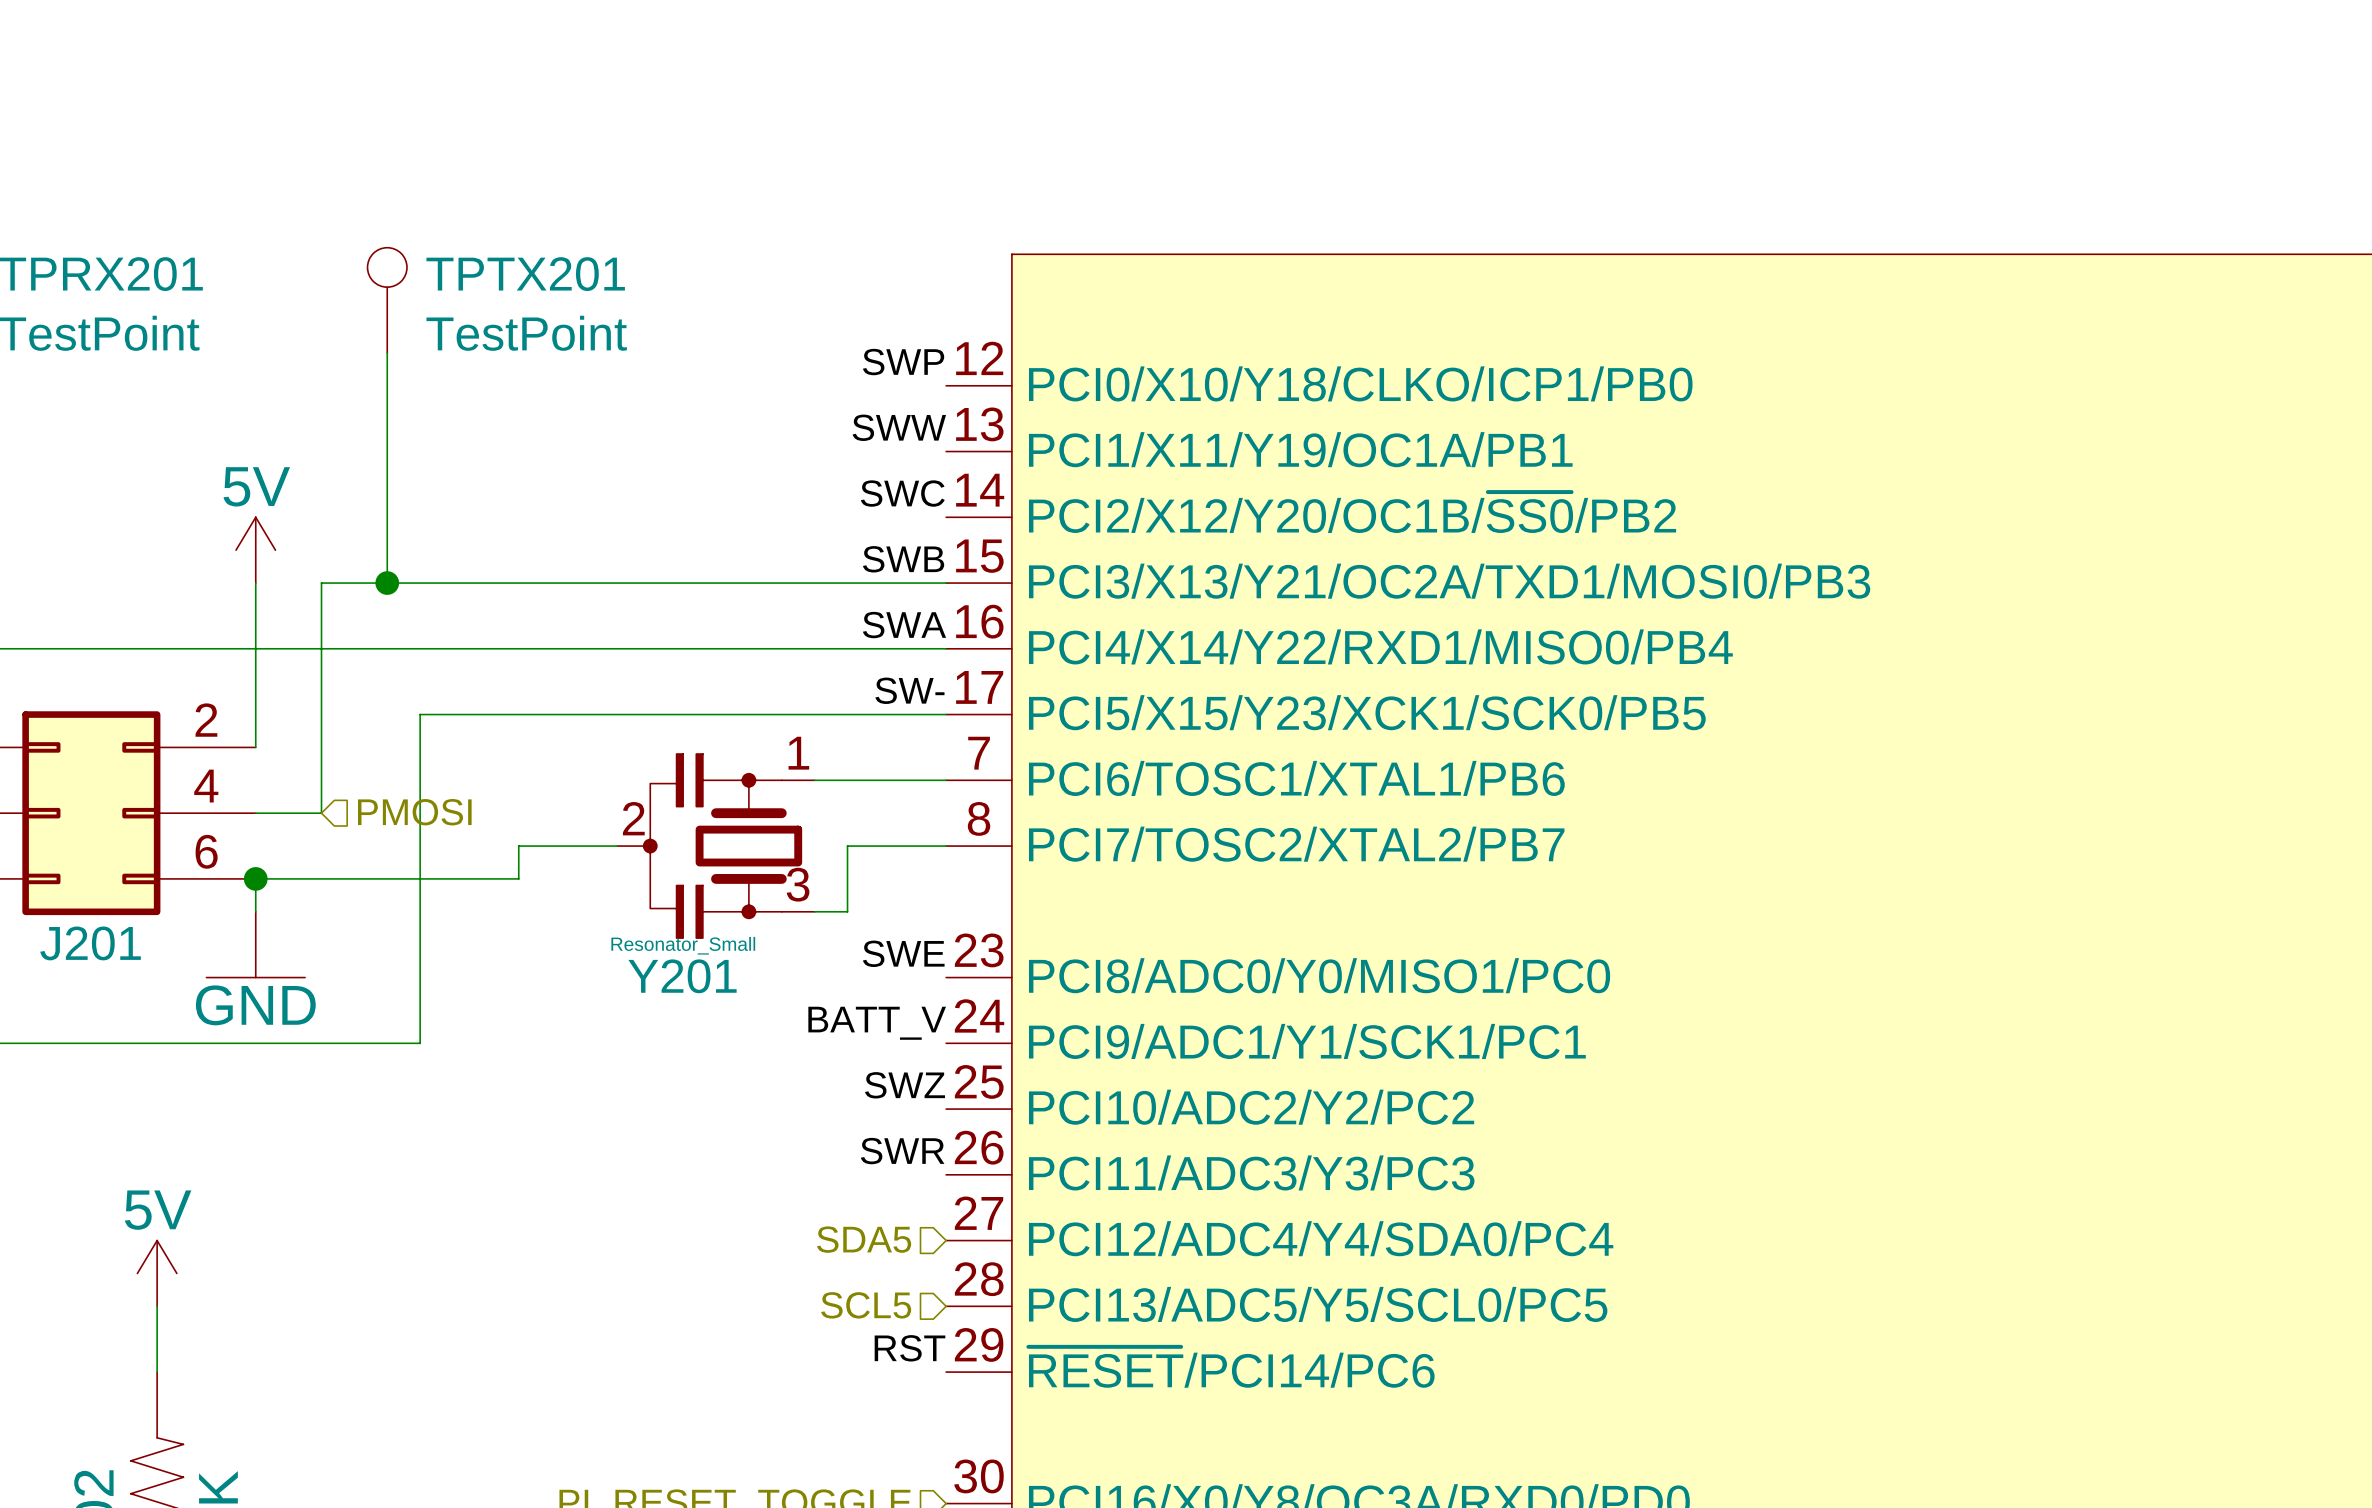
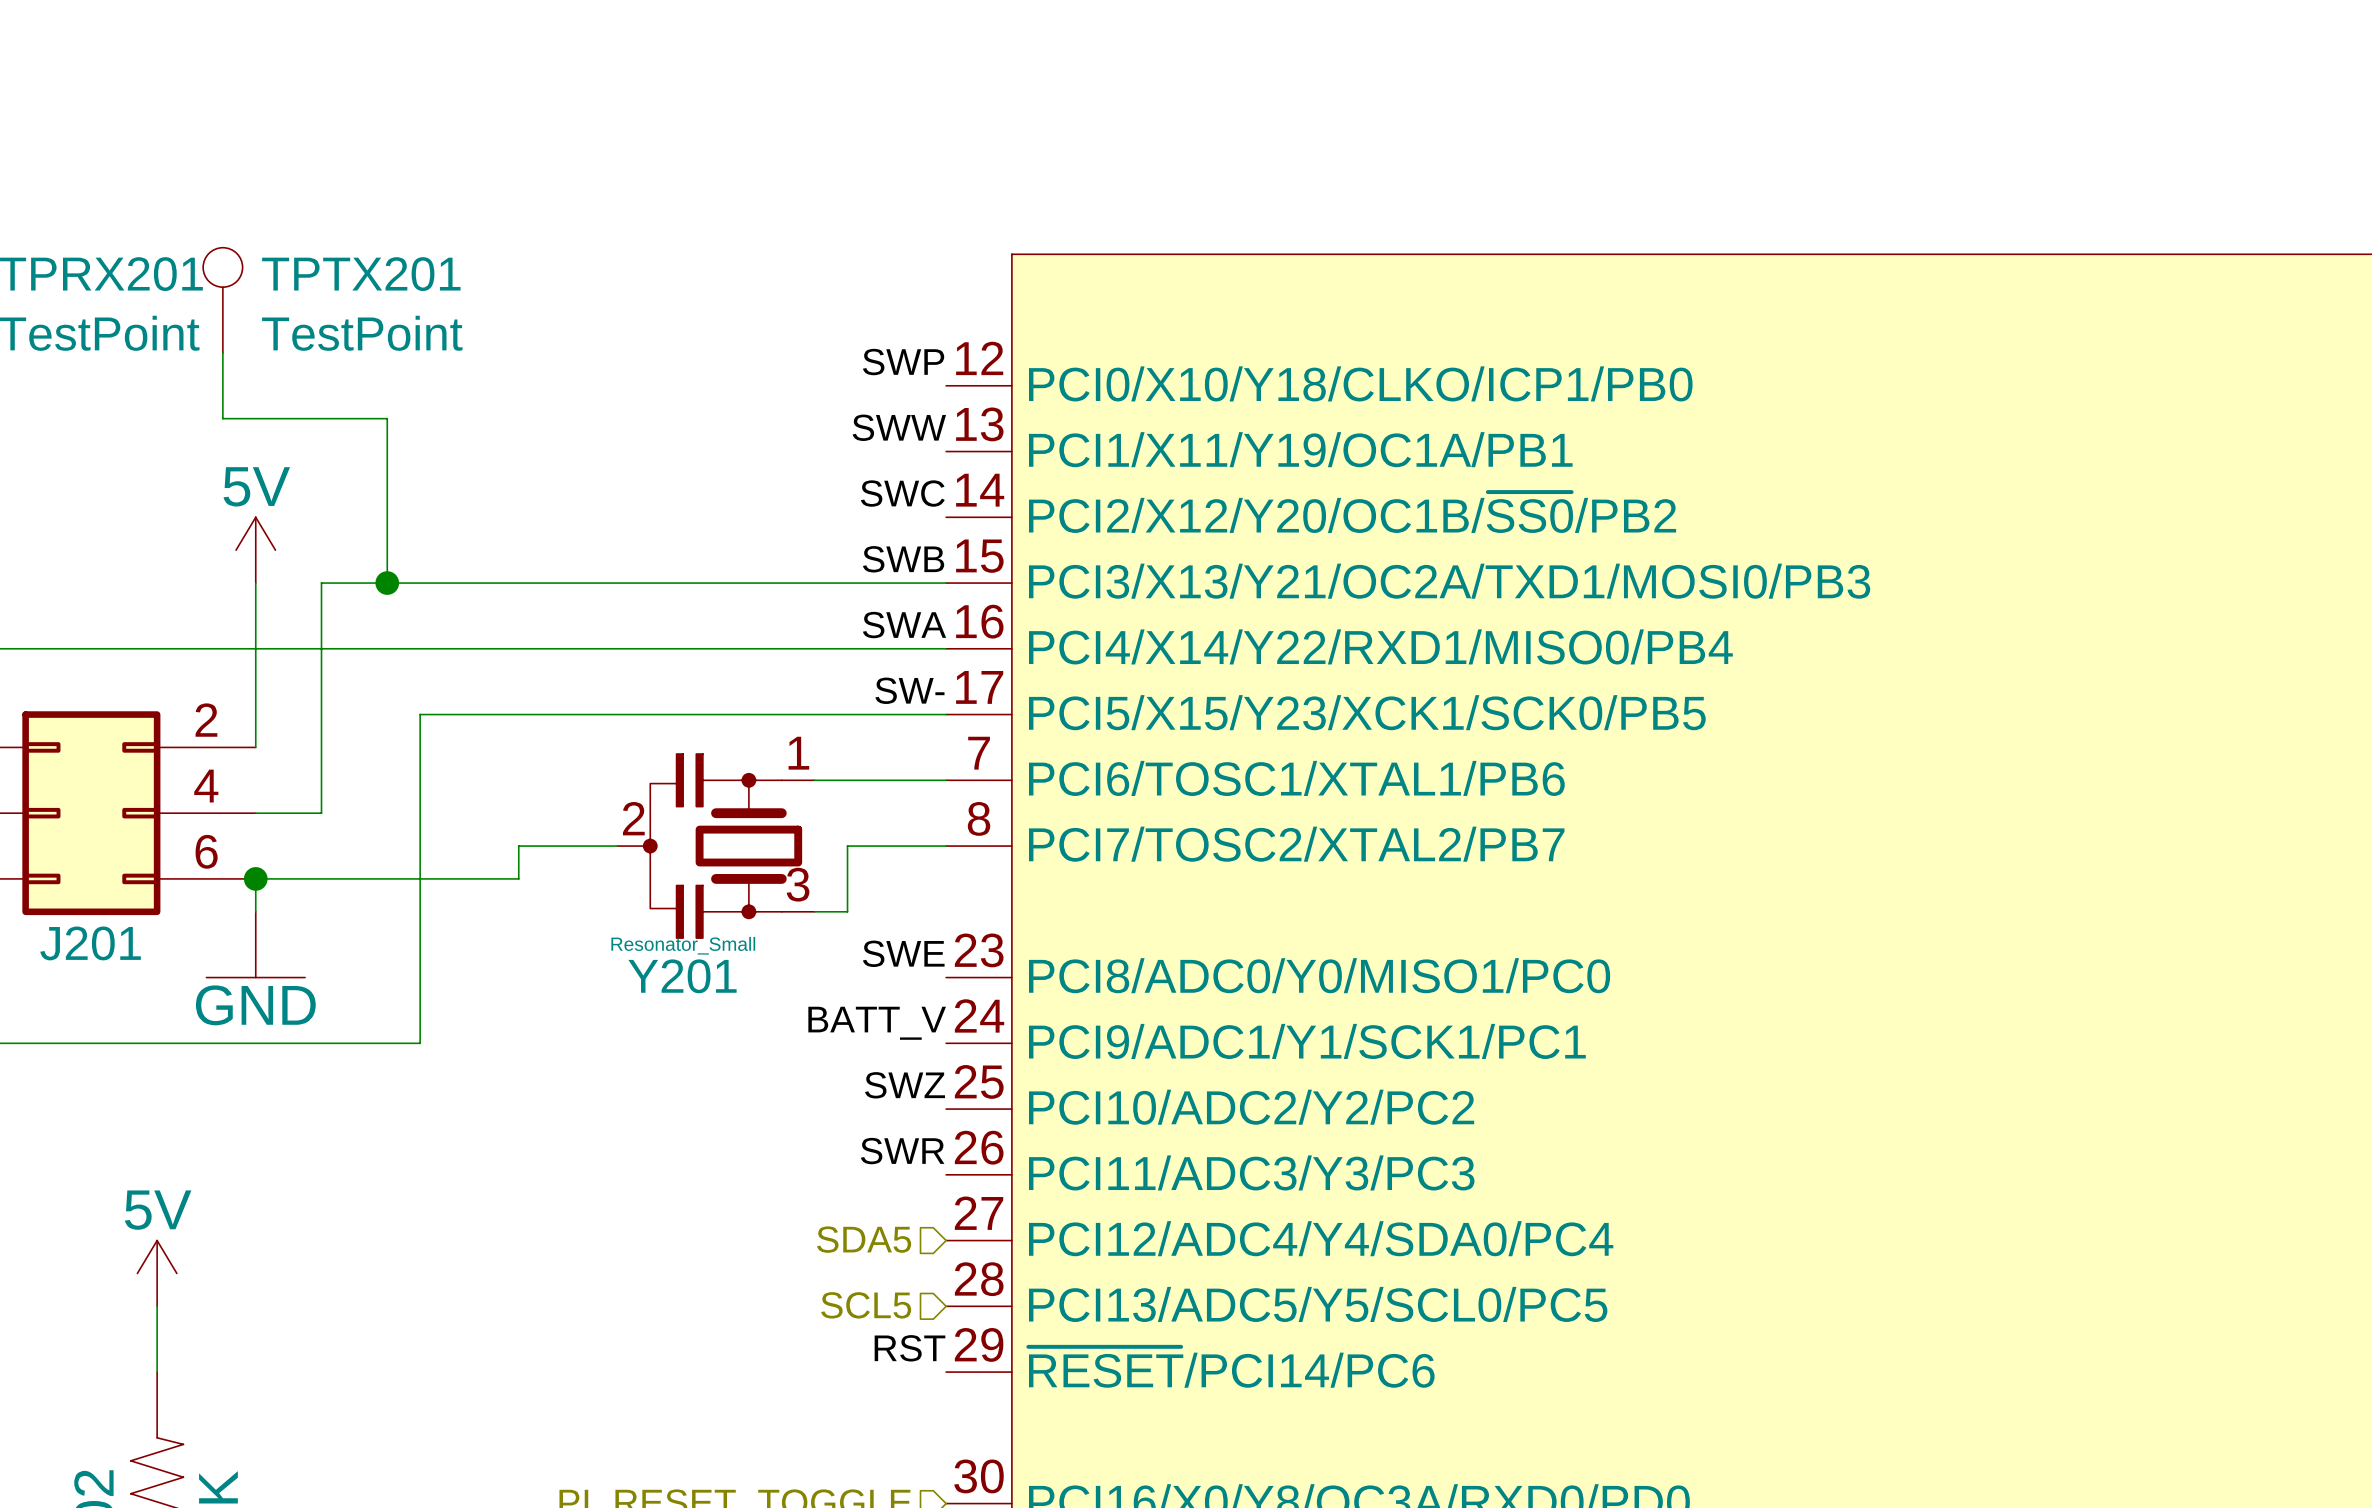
TPTX201 position: (387, 300) -> (222, 300)
wire: (387, 352) (387, 418) -> (222, 352) (222, 418) (387, 418)
hierarchical label: PMOSI (414, 812) -> none

